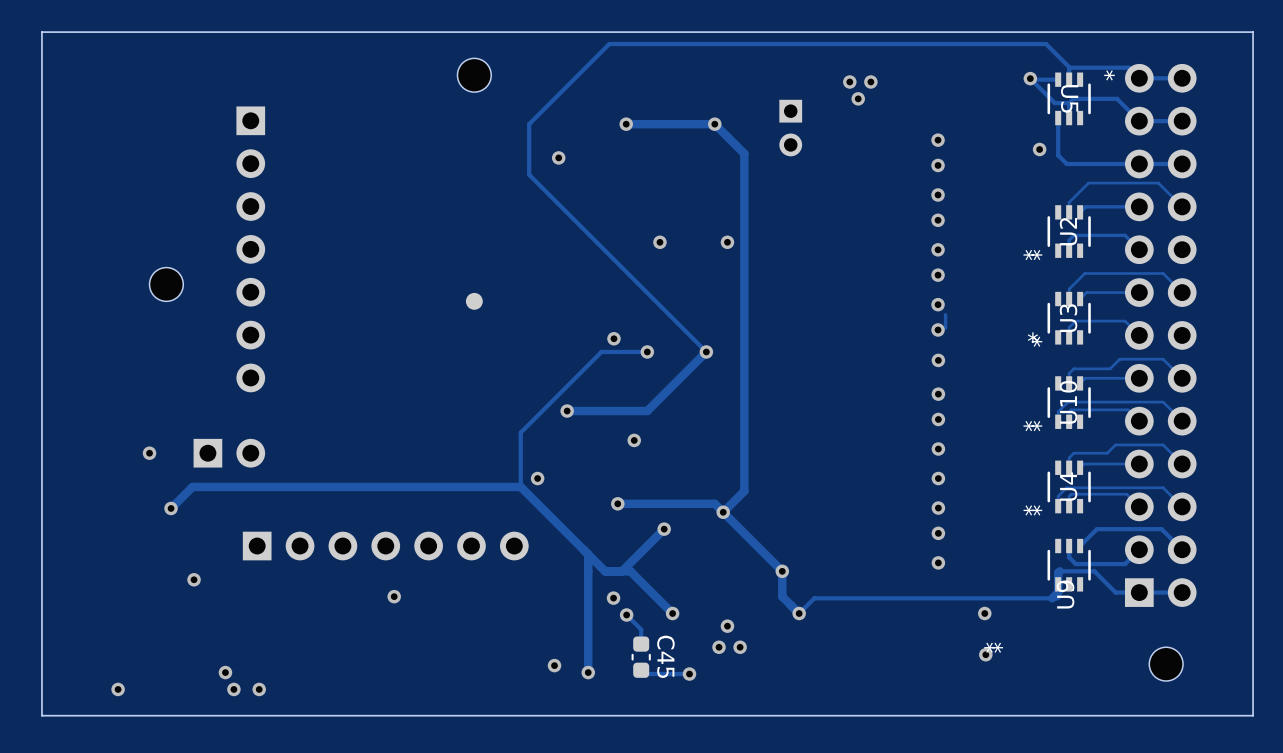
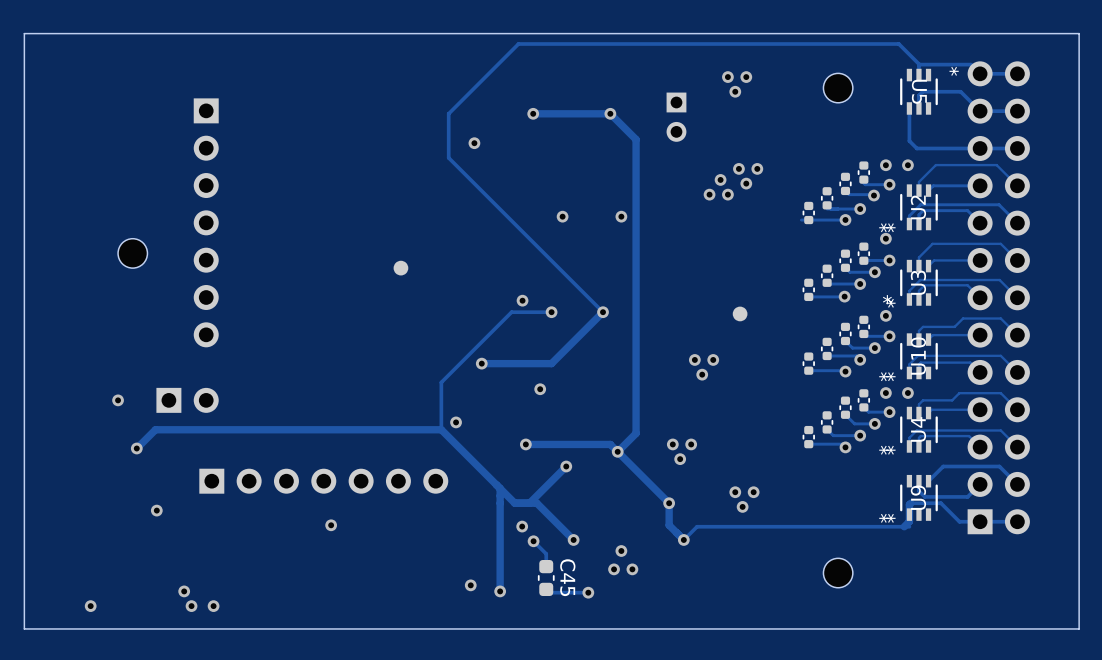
part: (474, 75) -> none
track: (1030, 78) (1054, 103) (1069, 103) -> none
via: (1030, 78) -> none
track: (1058, 79) (1031, 79) -> none
part: none -> (838, 88)
via: (938, 140) -> none
via: (1039, 149) -> none
via: (938, 165) -> none
via: none -> (885, 165)
via: none -> (907, 165)
via: none -> (738, 168)
via: none -> (757, 168)
part: none -> (863, 172)
via: (938, 194) -> none
track: none -> (863, 179) (865, 184) (889, 184)
via: none -> (720, 179)
via: none -> (746, 183)
part: none -> (845, 183)
via: none -> (889, 184)
track: none -> (845, 190) (849, 194) (873, 194) (874, 196)
via: none -> (709, 194)
via: none -> (727, 194)
via: none -> (873, 195)
via: (938, 220) -> none
part: none -> (827, 198)
track: none -> (863, 208) (827, 209)
via: none -> (860, 209)
part: none -> (808, 213)
track: none -> (845, 220) (801, 220)
via: none -> (845, 219)
via: (938, 249) -> none
track: none -> (1017, 223) (999, 204) (920, 204) (909, 215) (909, 224)
via: none -> (885, 238)
via: (938, 275) -> none
part: none -> (863, 253)
part: none -> (845, 260)
track: none -> (889, 260) (863, 260)
via: none -> (889, 260)
track: none -> (845, 267) (849, 272) (874, 272)
via: (938, 304) -> none
via: none -> (874, 272)
part: none -> (827, 275)
track: (945, 314) (945, 328) -> none
track: none -> (827, 282) (860, 284)
via: none -> (860, 284)
part: none -> (808, 289)
via: (938, 329) -> none
track: none -> (845, 295) (808, 296)
via: none -> (844, 296)
track: none -> (1017, 297) (999, 280) (920, 280) (909, 290) (909, 299)
part: none -> (740, 313)
via: none -> (885, 315)
via: (938, 360) -> none
part: none -> (863, 326)
part: none -> (845, 333)
track: none -> (863, 333) (866, 336) (889, 336)
via: none -> (889, 336)
track: none -> (845, 341) (852, 348) (874, 348)
via: none -> (874, 348)
via: (938, 394) -> none
part: none -> (827, 348)
track: none -> (827, 355) (856, 355) (860, 359)
via: none -> (694, 359)
via: none -> (713, 359)
via: none -> (860, 359)
part: none -> (808, 363)
via: (938, 419) -> none
track: none -> (808, 370) (845, 371)
via: none -> (845, 371)
via: none -> (702, 374)
via: none -> (885, 393)
via: none -> (907, 393)
via: (938, 448) -> none
part: none -> (863, 400)
part: none -> (845, 407)
track: none -> (863, 407) (868, 412) (889, 412)
via: none -> (889, 412)
track: none -> (845, 414) (854, 423) (874, 423)
via: (938, 478) -> none
part: none -> (827, 422)
via: none -> (874, 423)
track: none -> (827, 429) (833, 435) (860, 435)
via: none -> (860, 435)
part: none -> (808, 437)
via: none -> (672, 444)
via: none -> (691, 444)
track: none -> (808, 444) (842, 444) (845, 447)
via: none -> (845, 447)
via: (938, 508) -> none
via: none -> (680, 459)
via: (938, 533) -> none
U9 footprint: [1047, 538, 1091, 592] -> [900, 474, 938, 521]
via: none -> (735, 492)
via: none -> (753, 492)
via: (938, 562) -> none
via: none -> (742, 506)
via: (984, 613) -> none
via: (985, 654) -> none
part position: (1166, 664) -> (838, 573)

